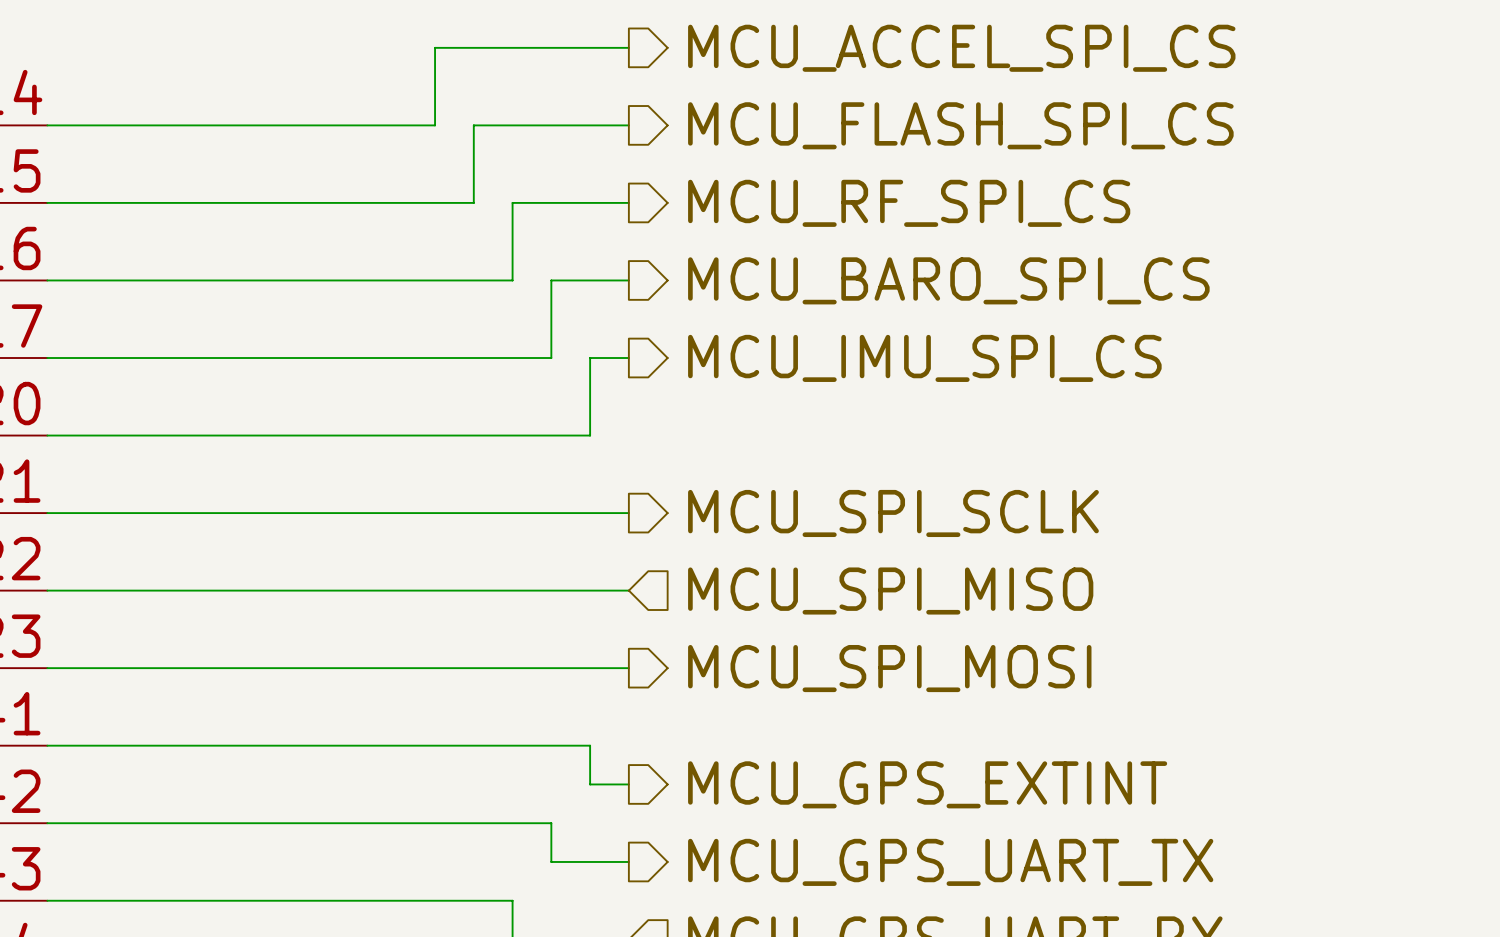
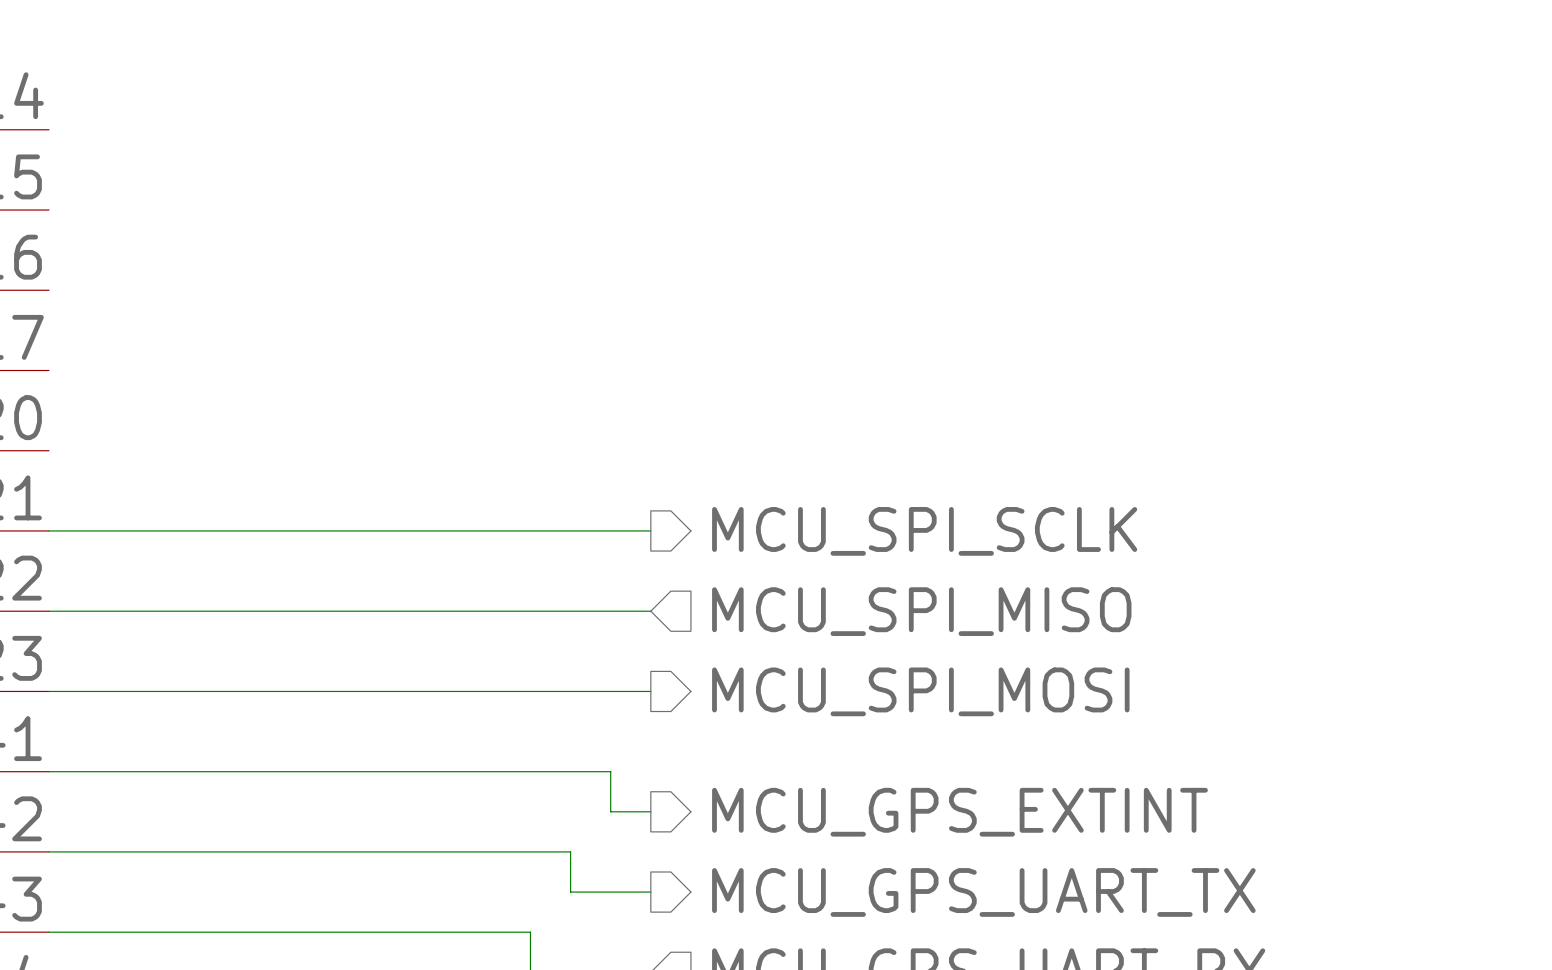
wire: (628, 47) (435, 47) (435, 125) (47, 125) -> none
hierarchical label: MCU_ACCEL_SPI_CS (961, 48) -> none
wire: (628, 125) (473, 125) (473, 202) (47, 202) -> none
hierarchical label: MCU_FLASH_SPI_CS (960, 125) -> none
wire: (628, 202) (512, 202) (512, 280) (47, 280) -> none
hierarchical label: MCU_RF_SPI_CS (909, 203) -> none
wire: (628, 280) (551, 280) (551, 358) (47, 358) -> none
hierarchical label: MCU_BARO_SPI_CS (948, 280) -> none
wire: (628, 358) (590, 358) (590, 435) (47, 435) -> none
hierarchical label: MCU_IMU_SPI_CS (924, 358) -> none

